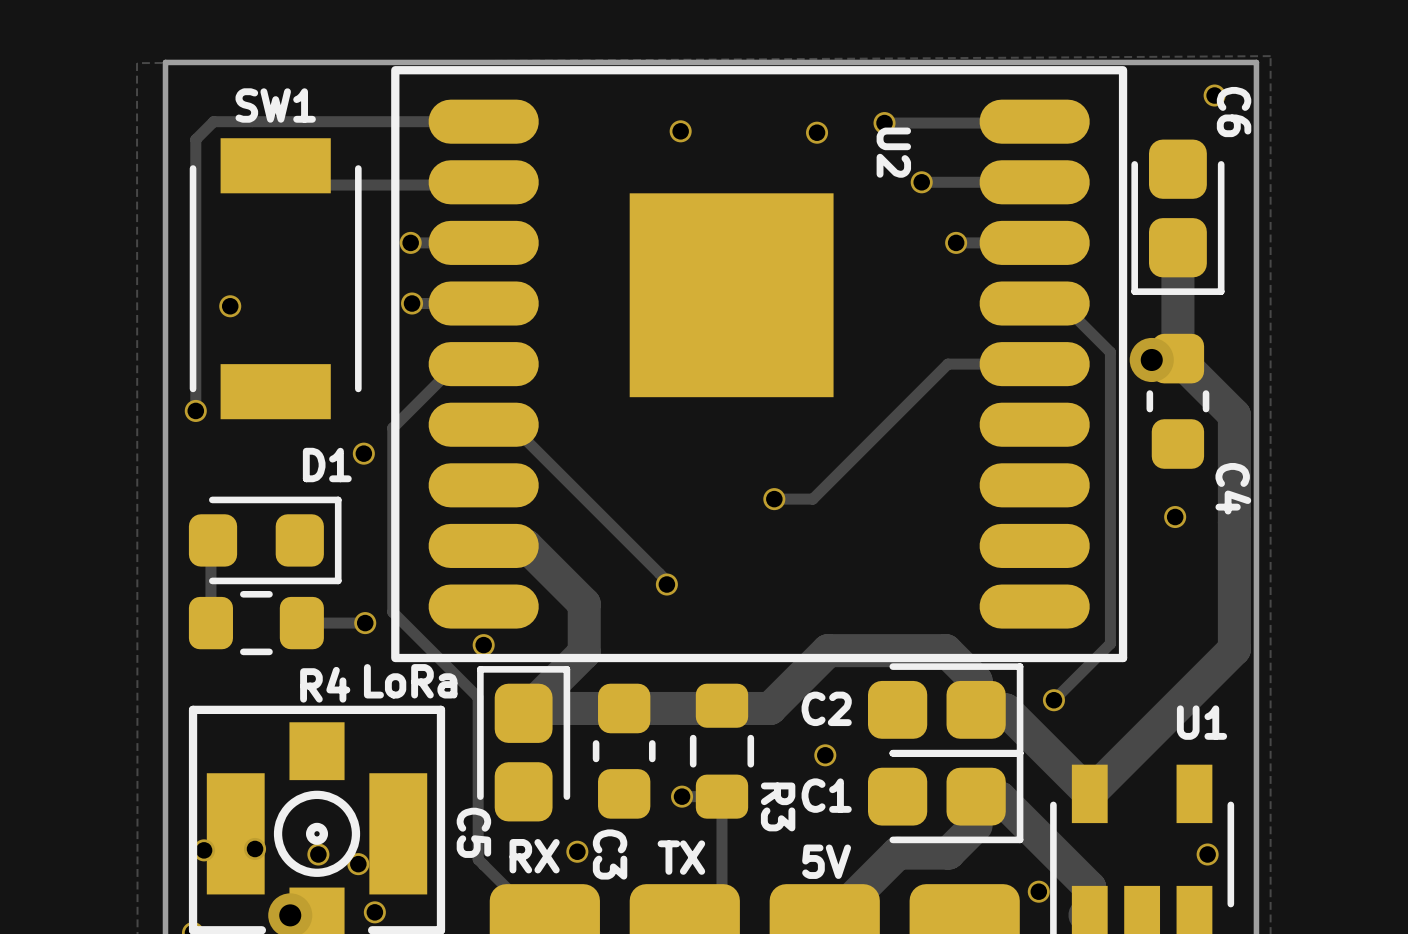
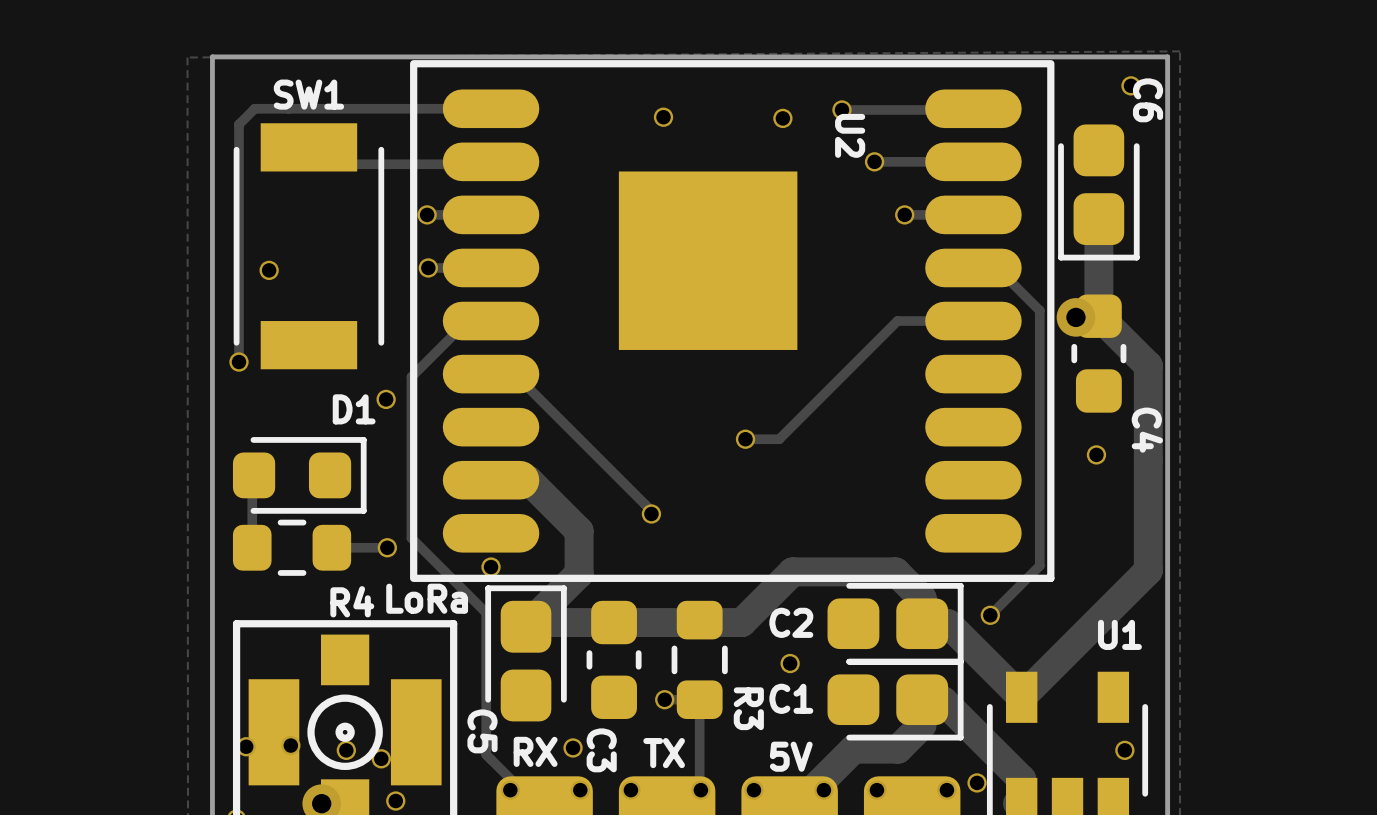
via: none -> (510, 790)
via: none -> (580, 790)
via: none -> (630, 790)
via: none -> (700, 790)
via: none -> (753, 790)
via: none -> (823, 790)
via: none -> (876, 790)
via: none -> (946, 790)

